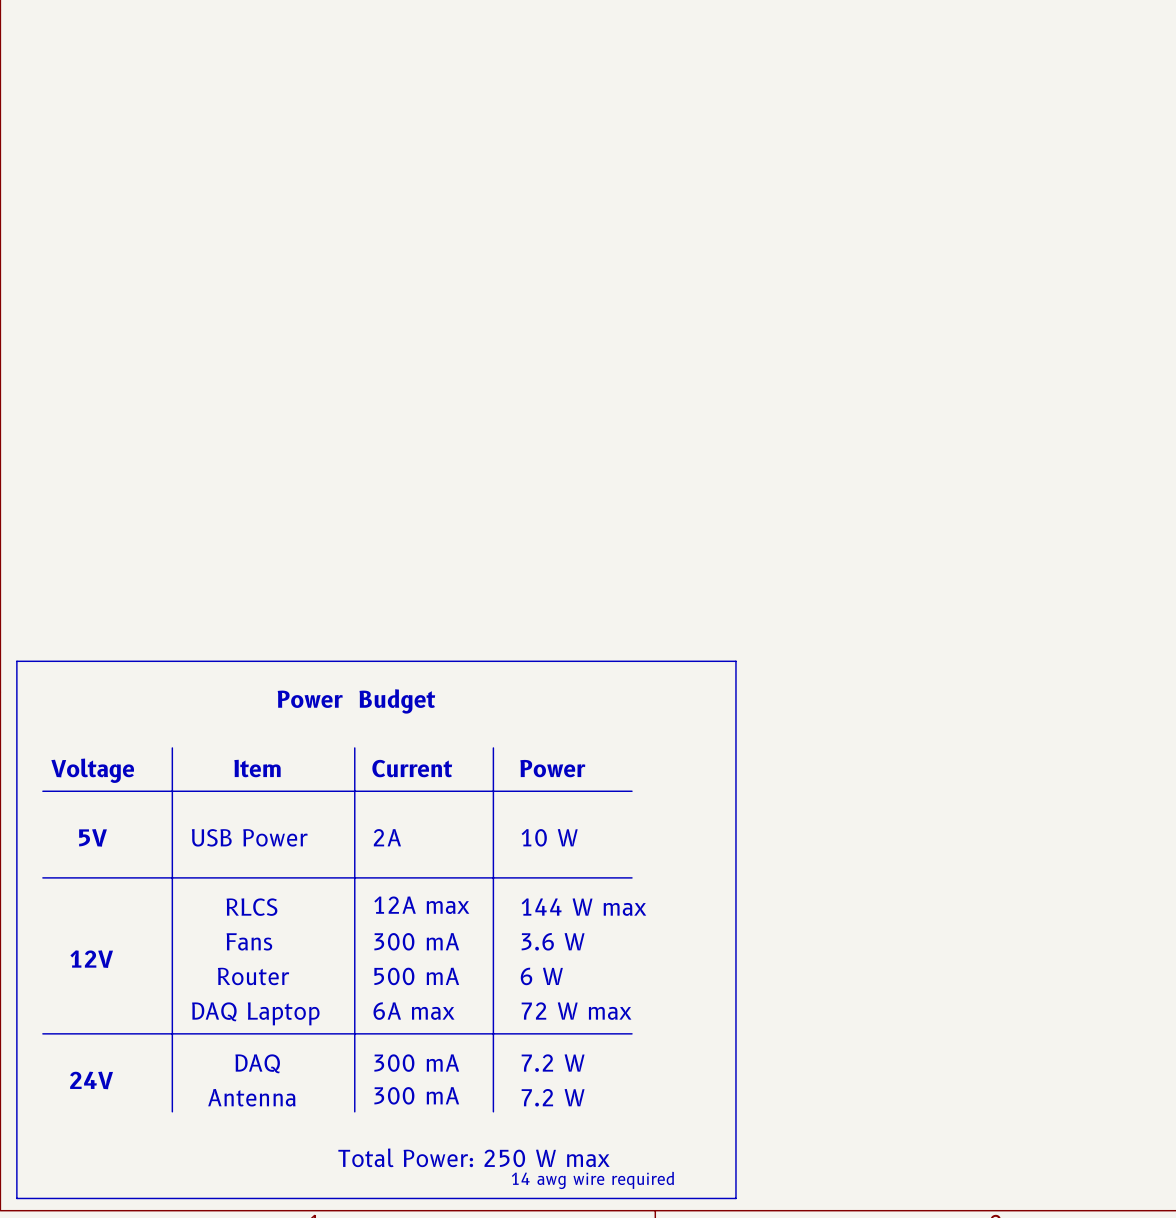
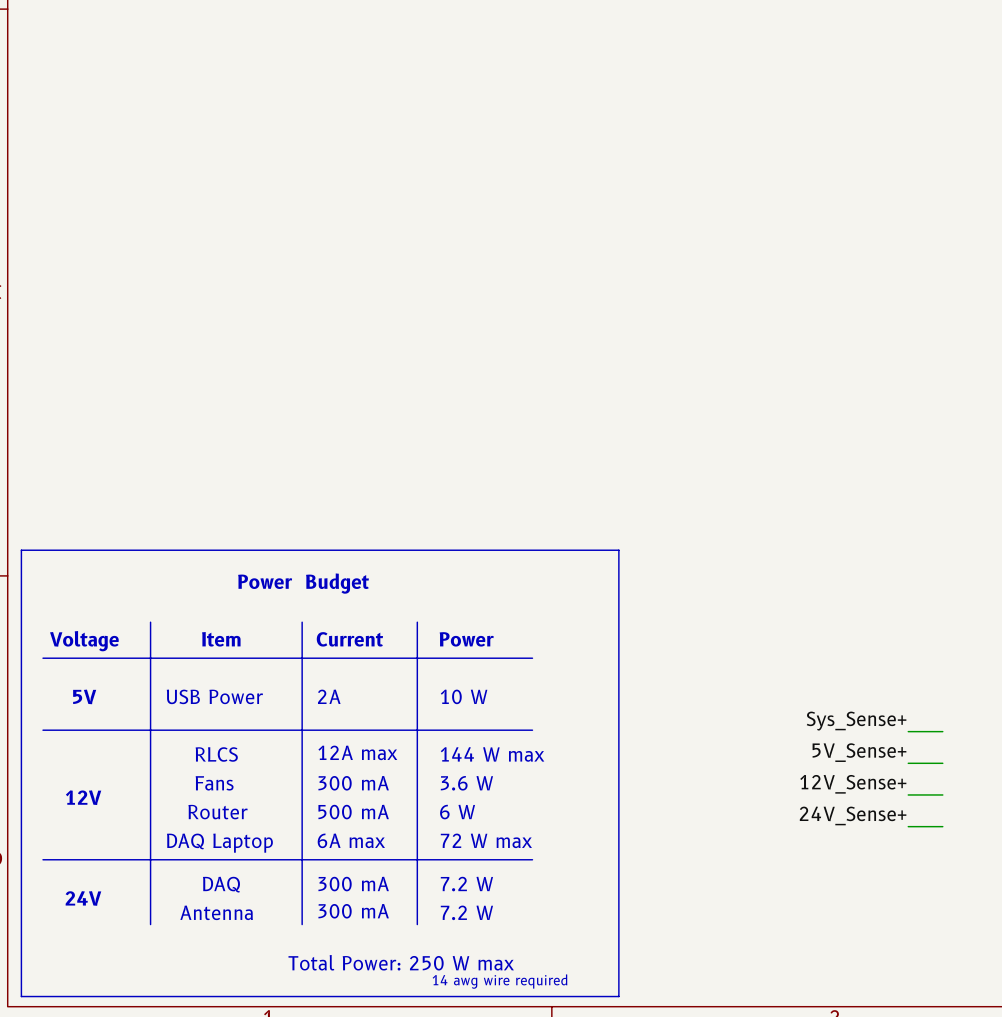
label: none -> Sys_Sense+ (856, 721)
wire: none -> (908, 731) (942, 731)
label: none -> 5V_Sense+ (859, 752)
wire: none -> (908, 763) (942, 763)
label: none -> 12V_Sense+ (853, 784)
wire: none -> (908, 794) (942, 794)
label: none -> 24V_Sense+ (853, 815)
wire: none -> (908, 826) (942, 826)

